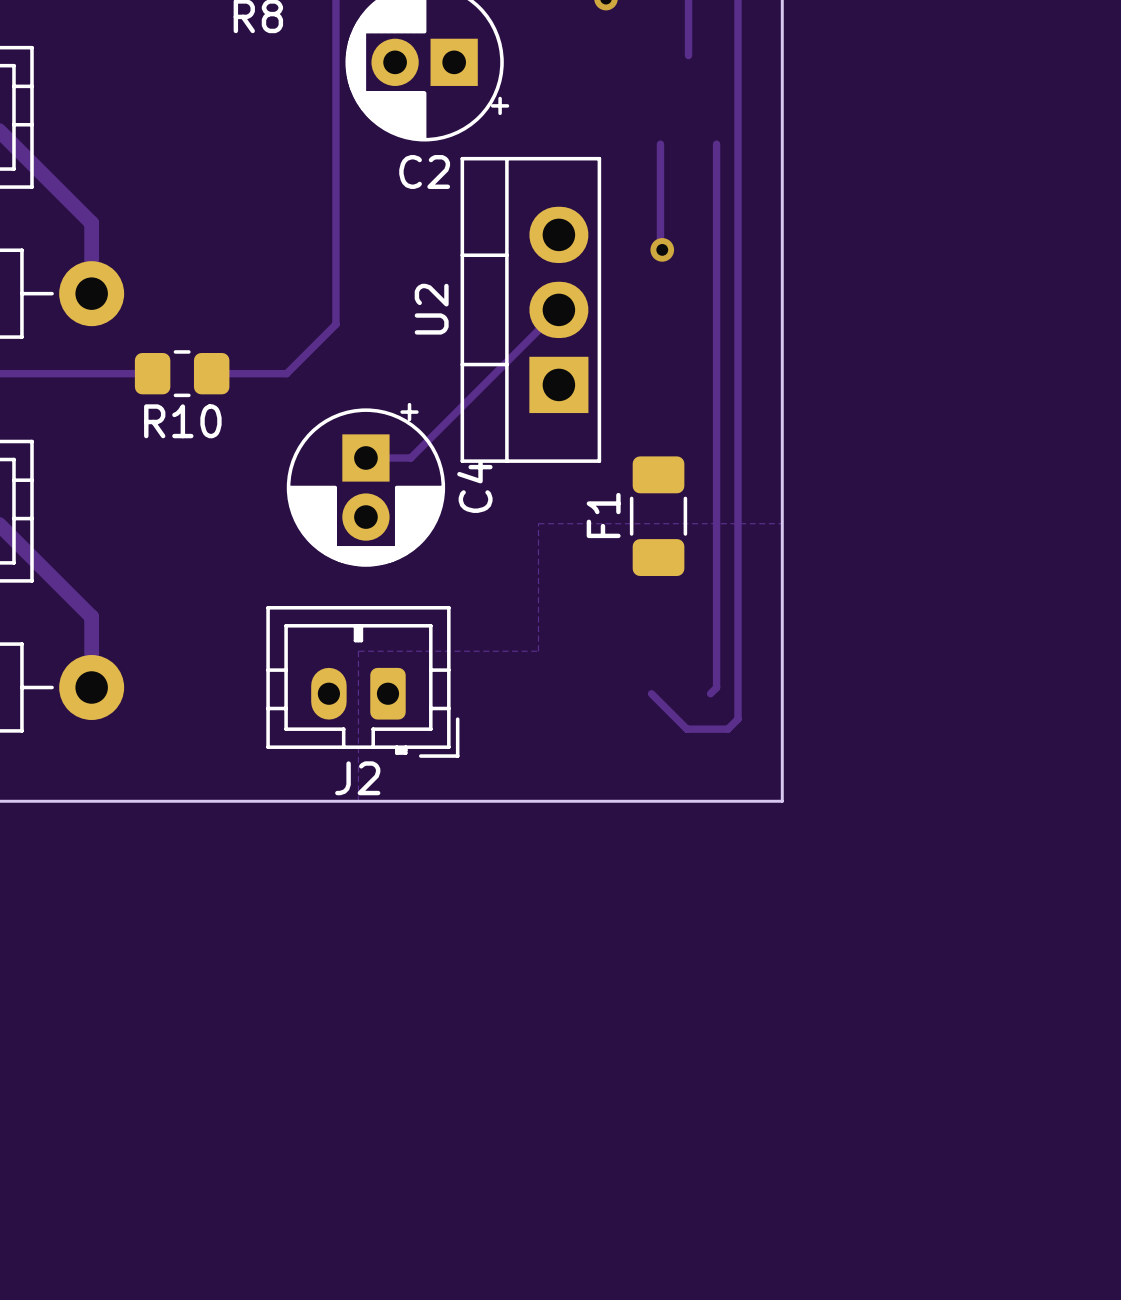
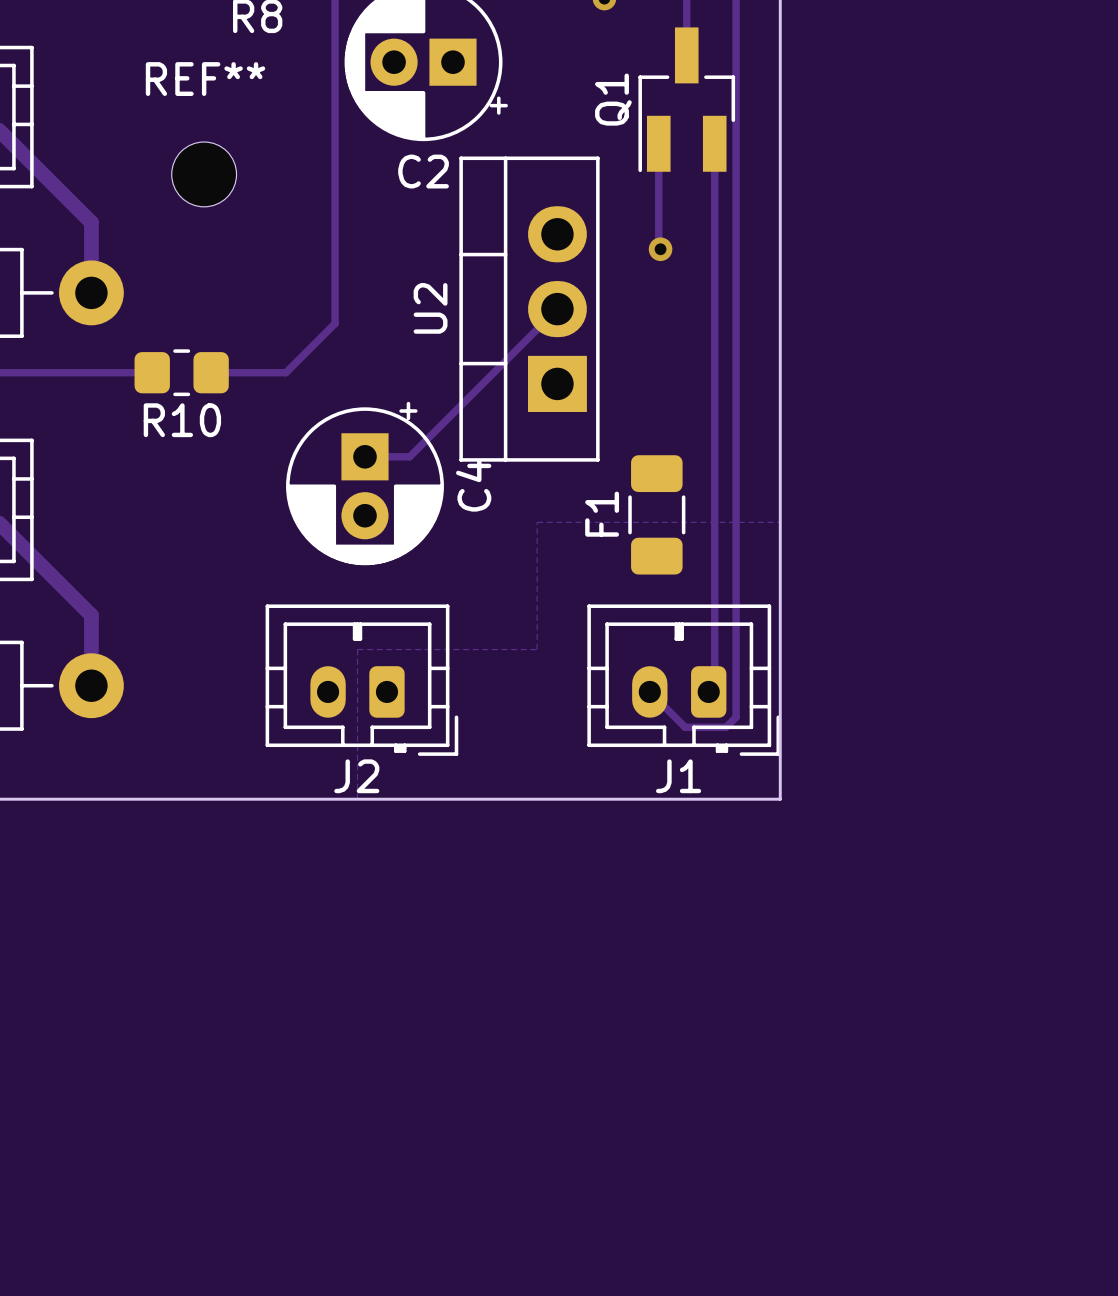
Q1: none -> (686, 99)
REF**: none -> (204, 174)
J1: none -> (683, 680)

